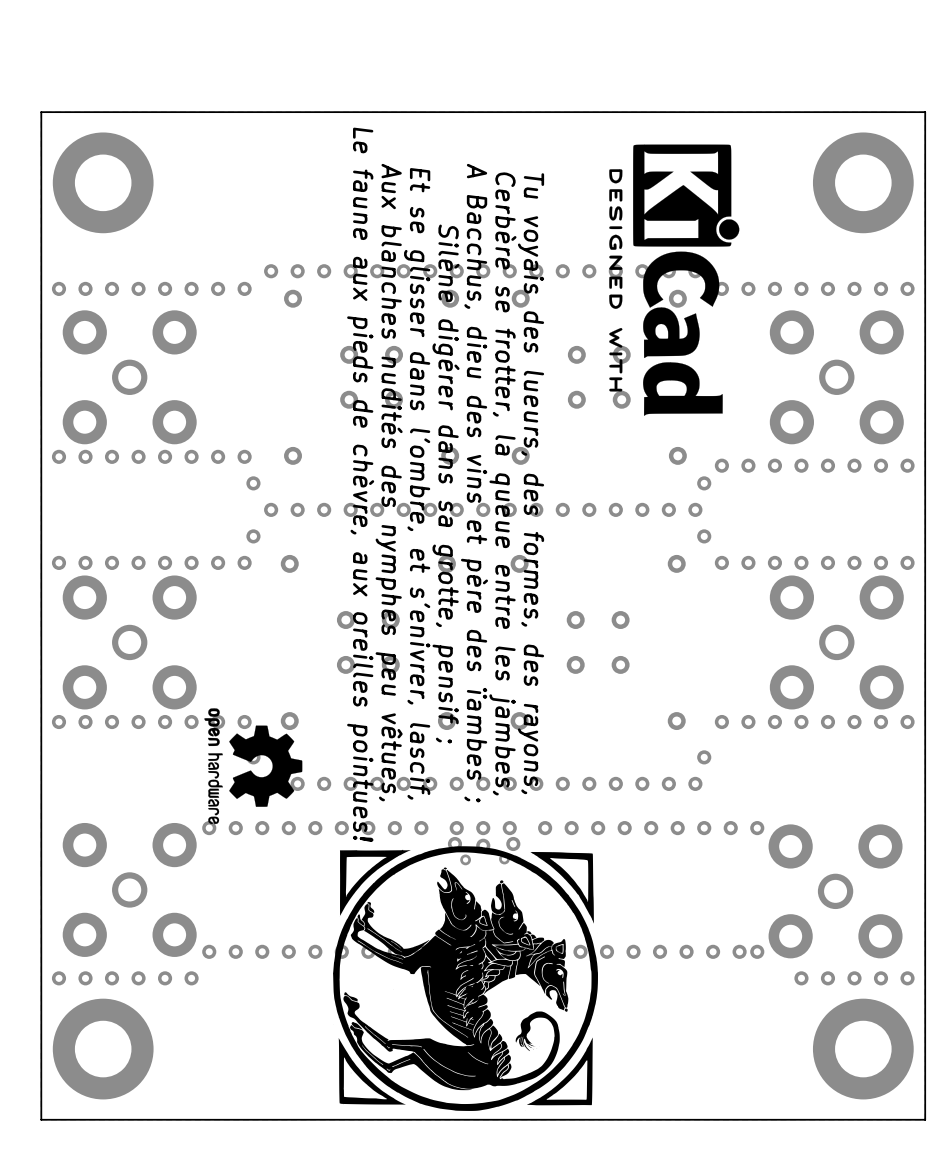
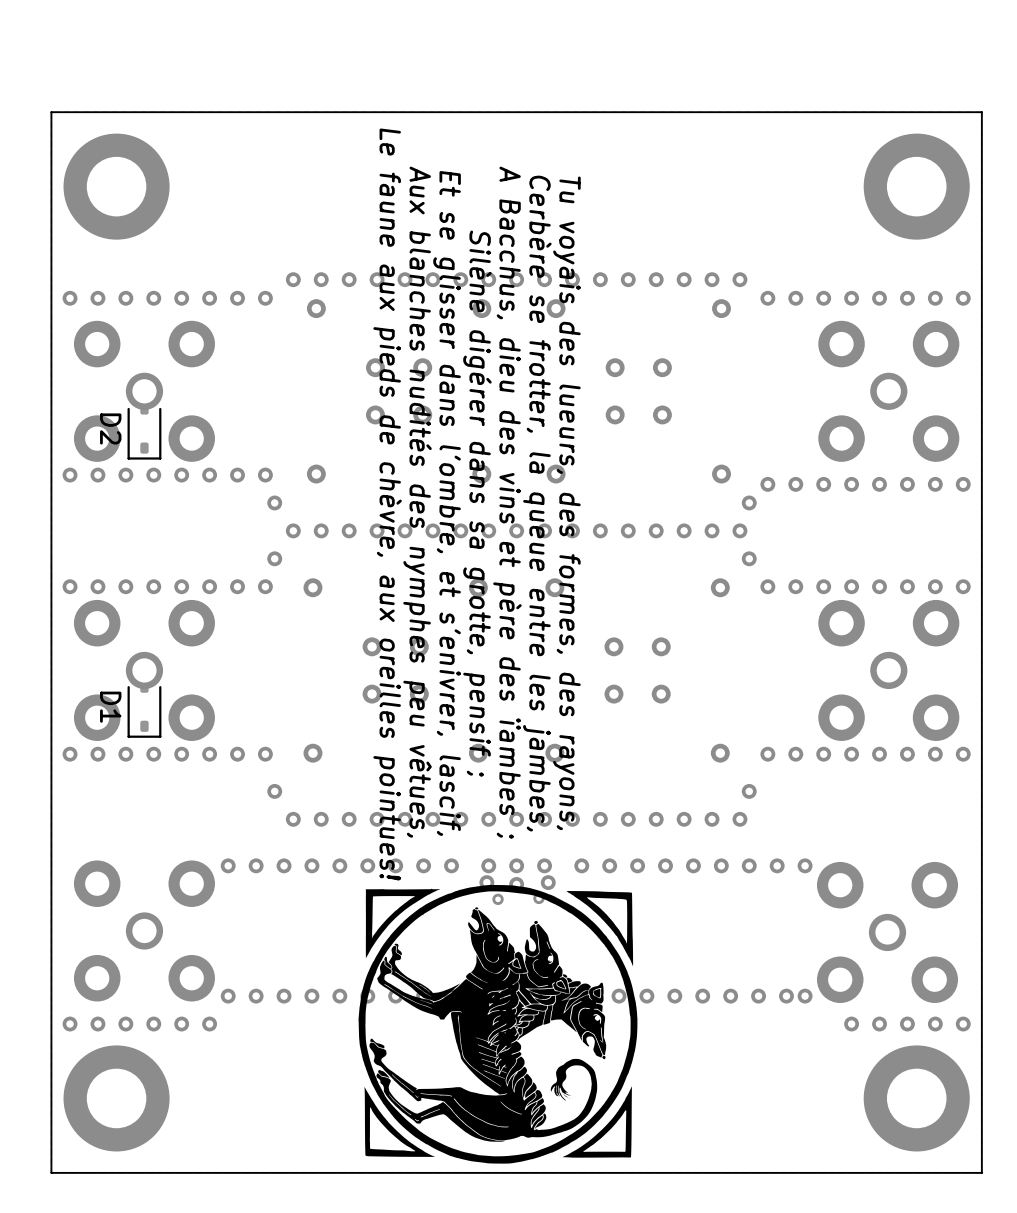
drawing: [609, 144, 740, 416] -> none
D2: none -> (144, 431)
D1: none -> (144, 709)
drawing: [204, 708, 303, 825] -> none

